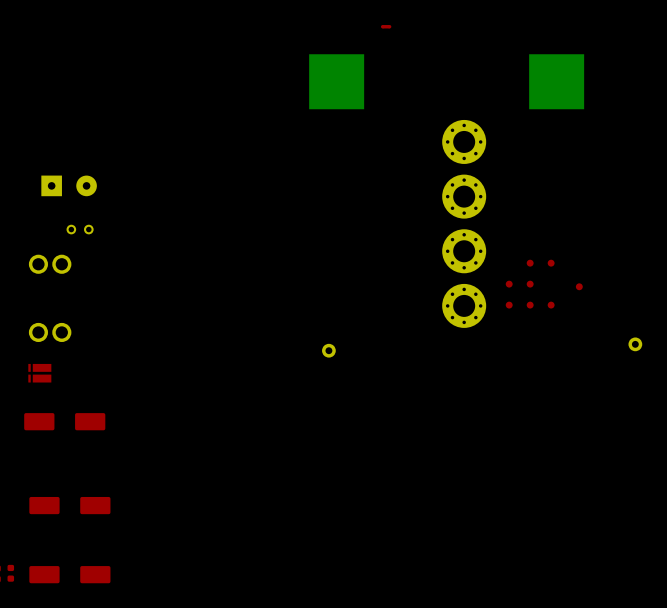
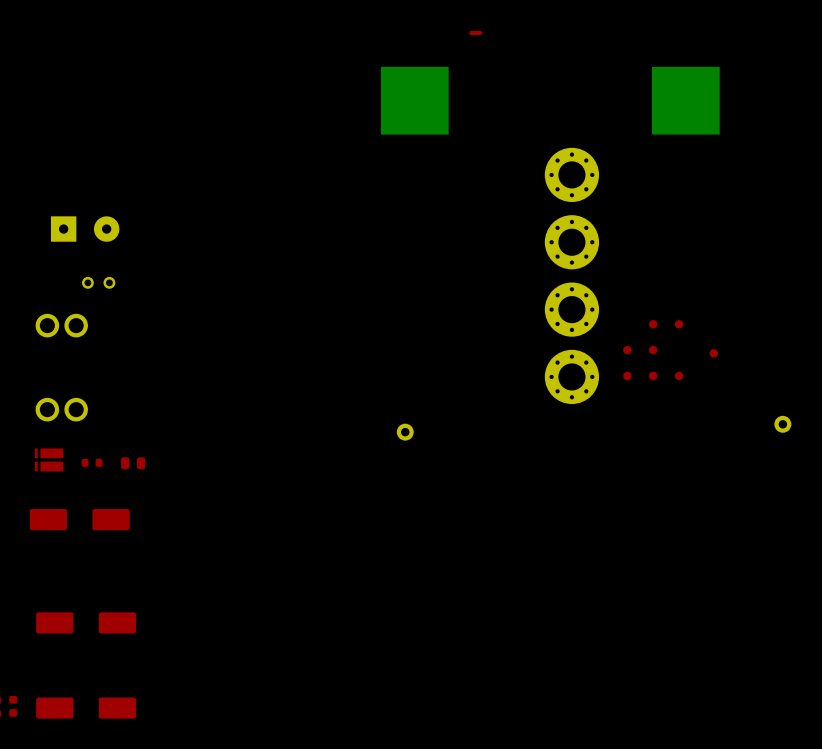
part: none -> (92, 462)
part: none -> (133, 463)

